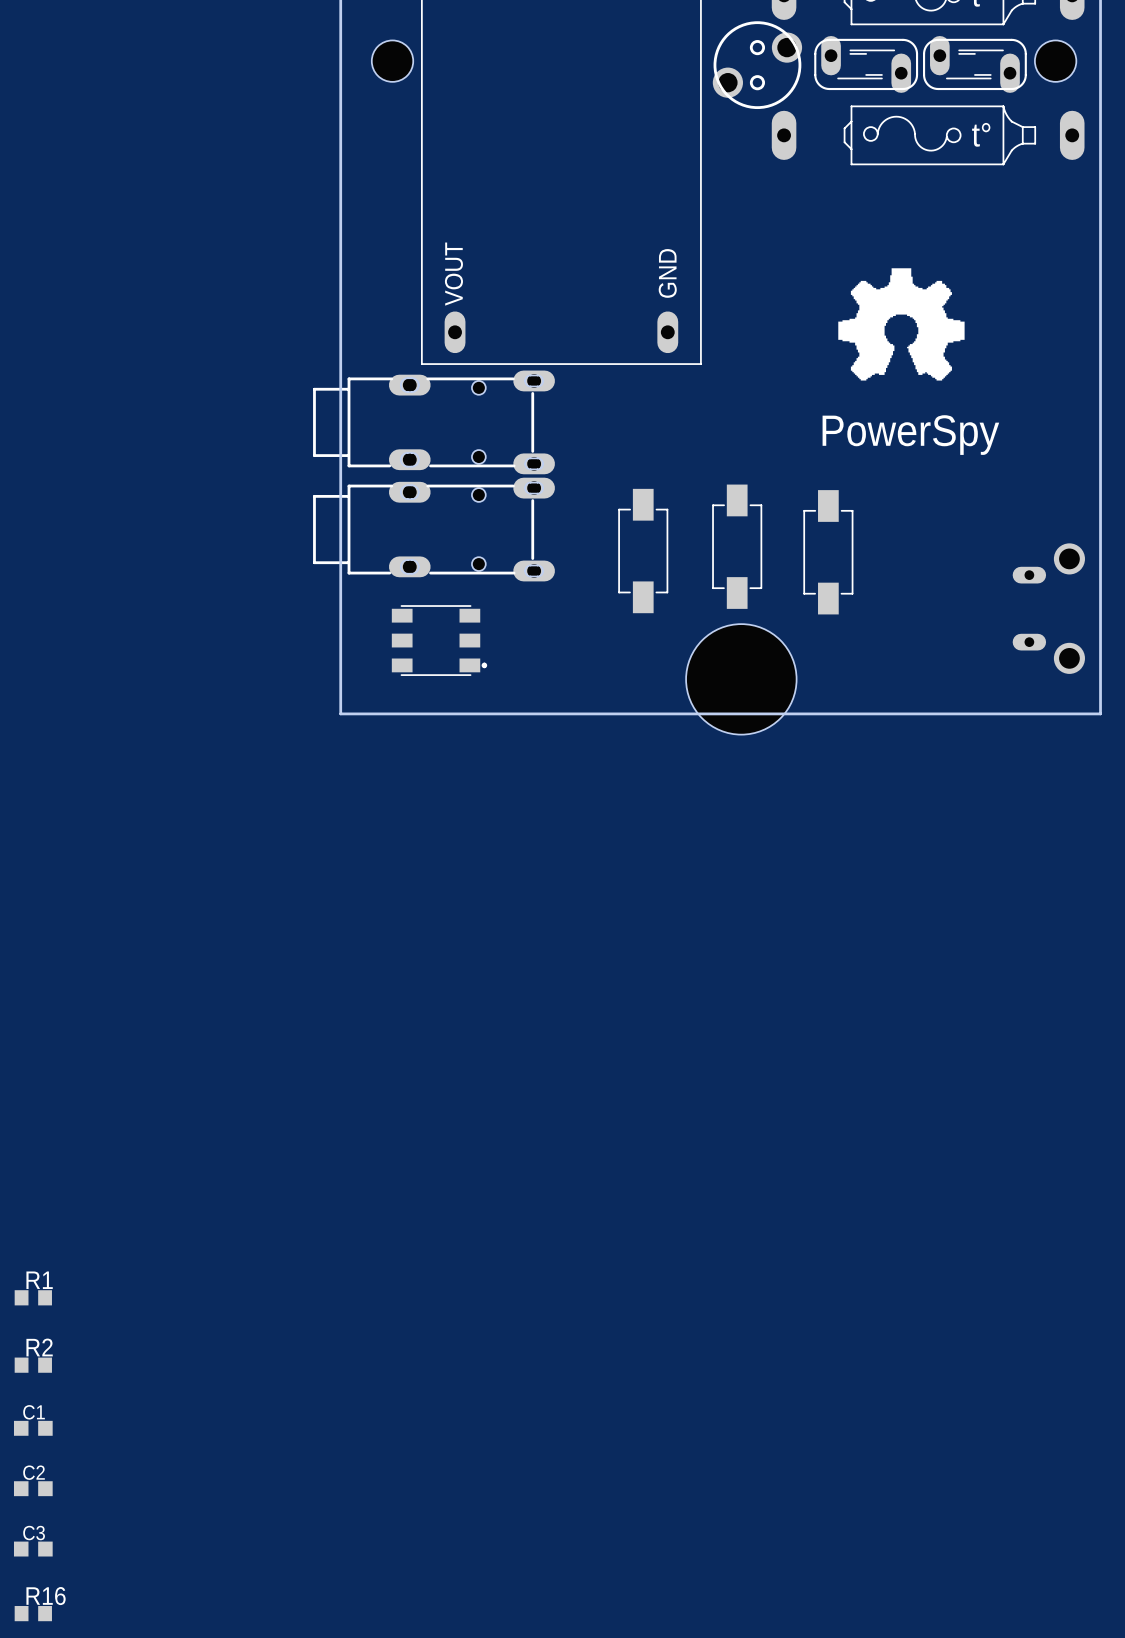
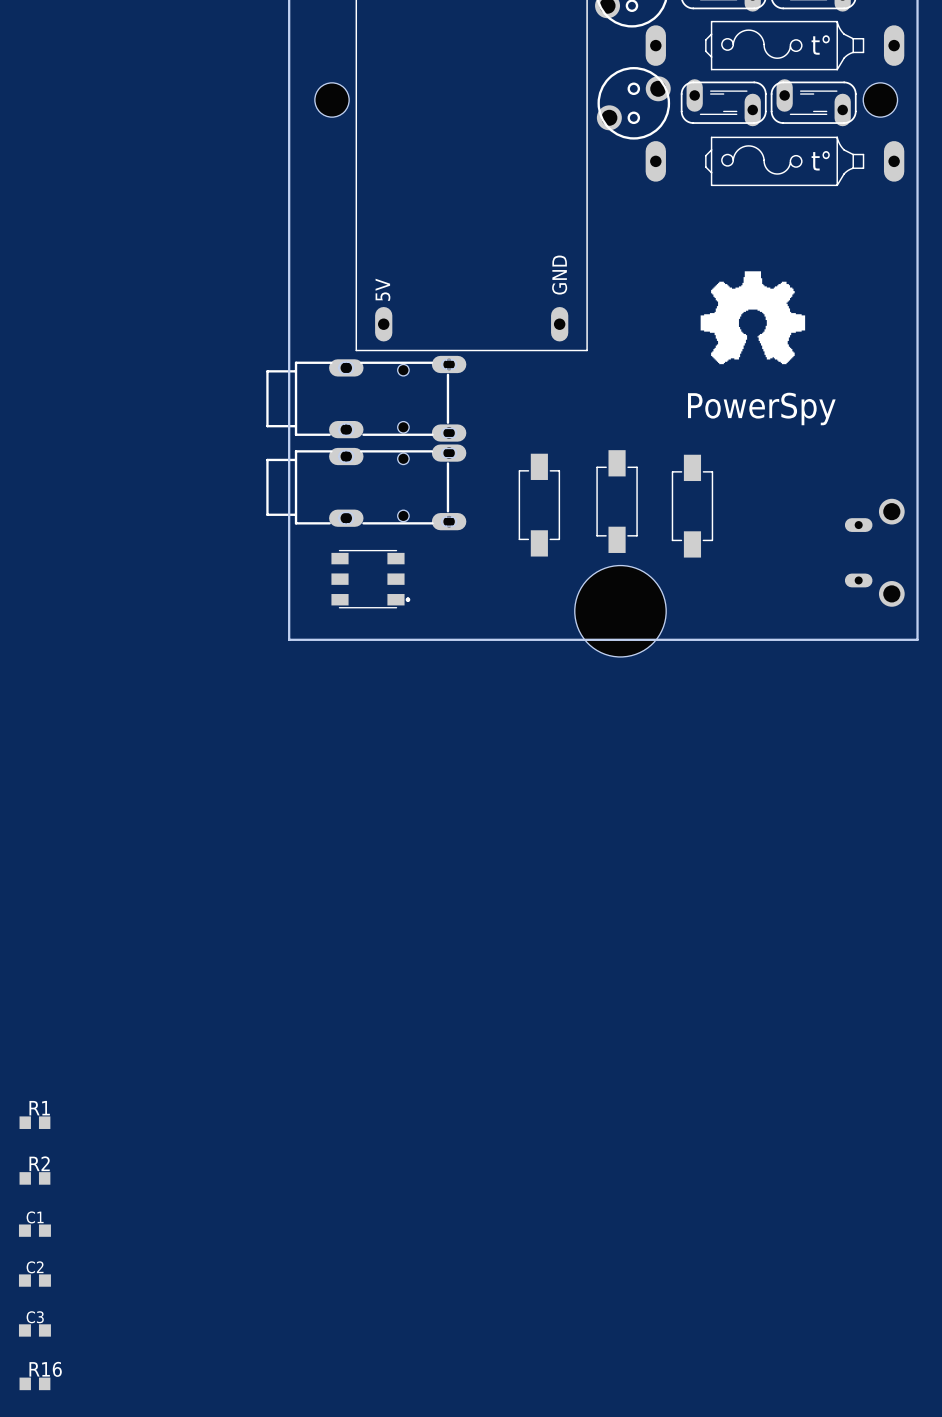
part text: VOUT (453, 274) -> none
part text: none -> 5V (382, 289)

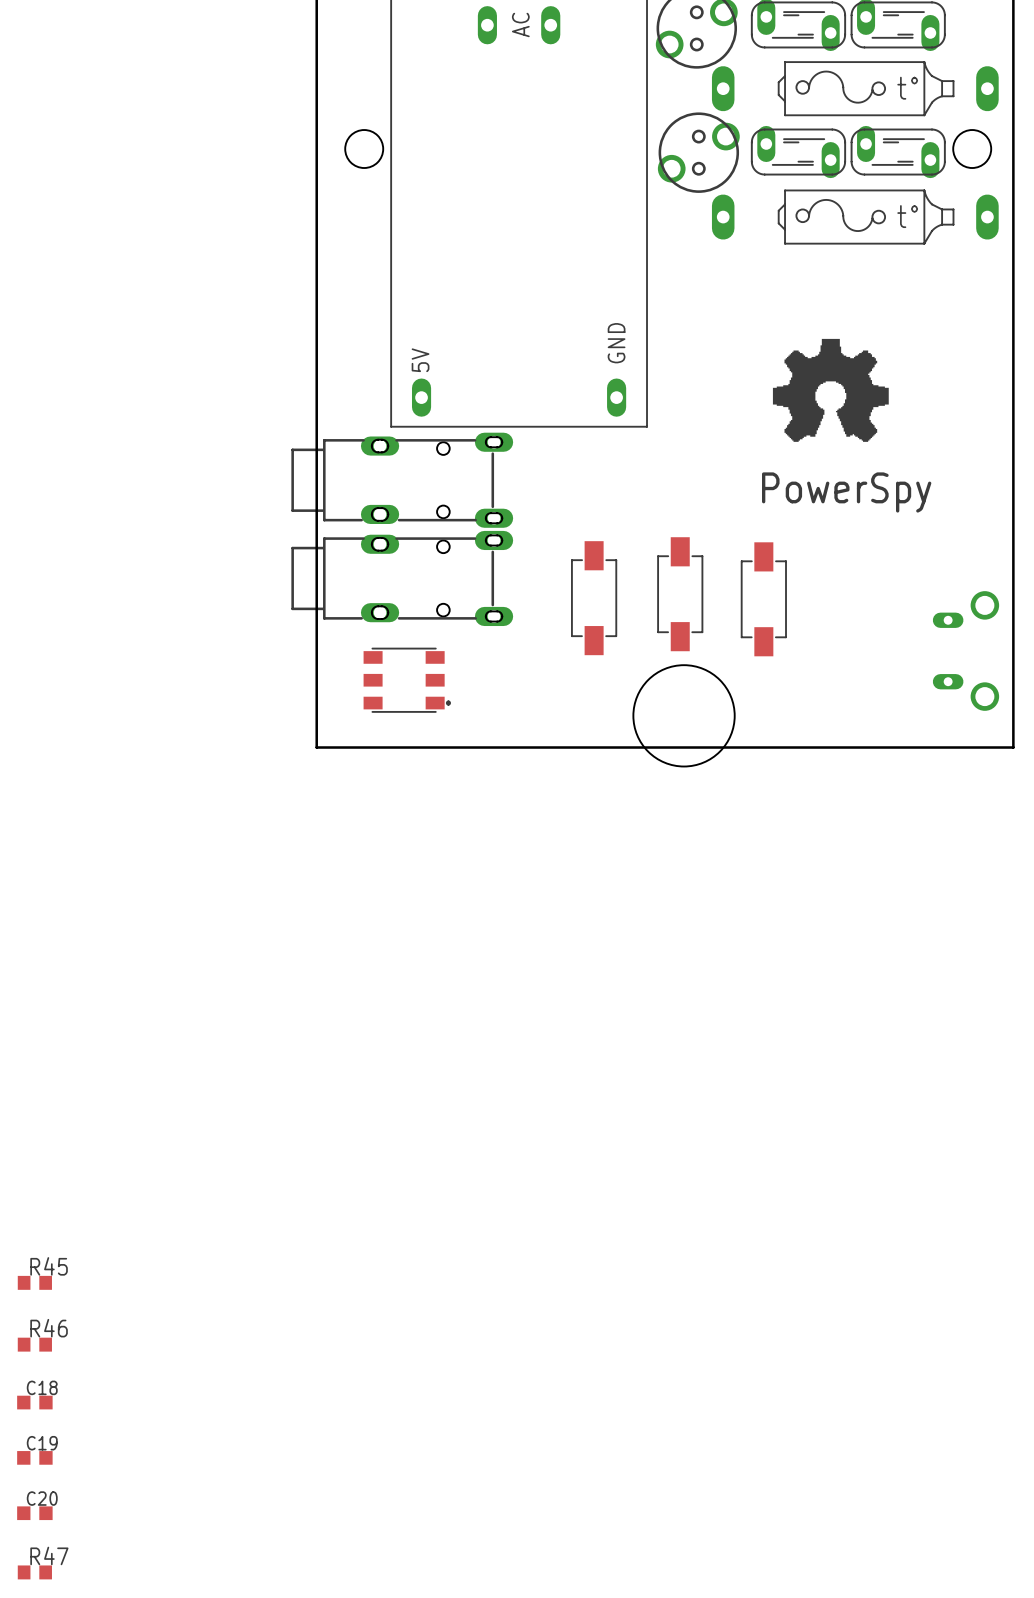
R1 name: R1 (39, 1108) -> R45 (49, 1266)
R2 name: R2 (39, 1163) -> R46 (49, 1328)
C1 name: C1 (35, 1217) -> C18 (42, 1387)
C2 name: C2 (35, 1267) -> C19 (42, 1443)
C3 name: C3 (35, 1317) -> C20 (42, 1498)
R16 name: R16 (45, 1369) -> R47 (49, 1555)

